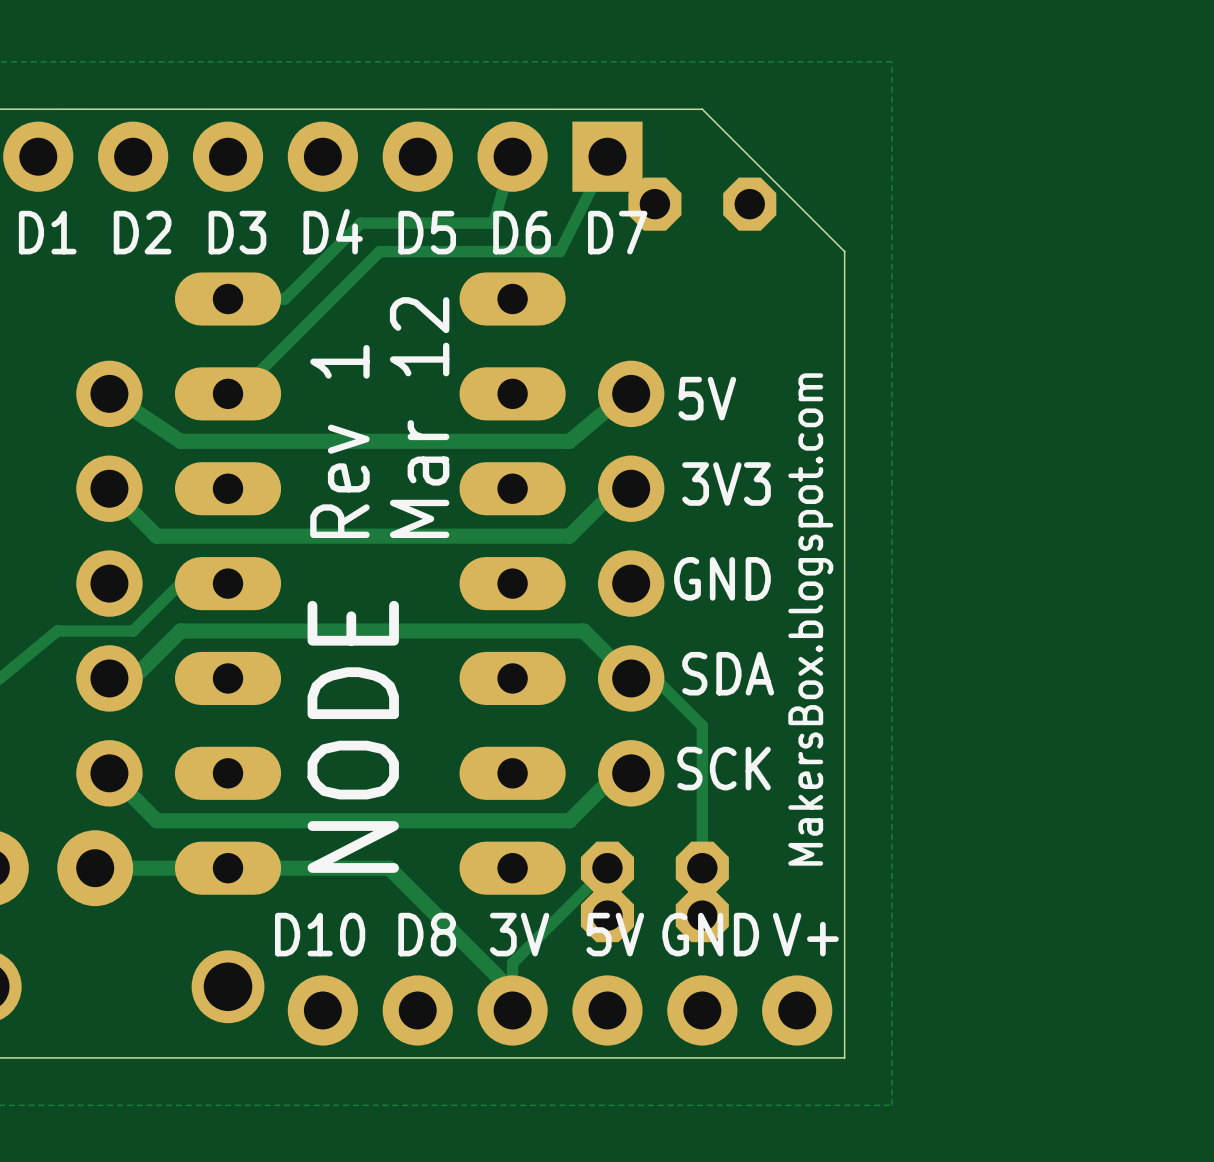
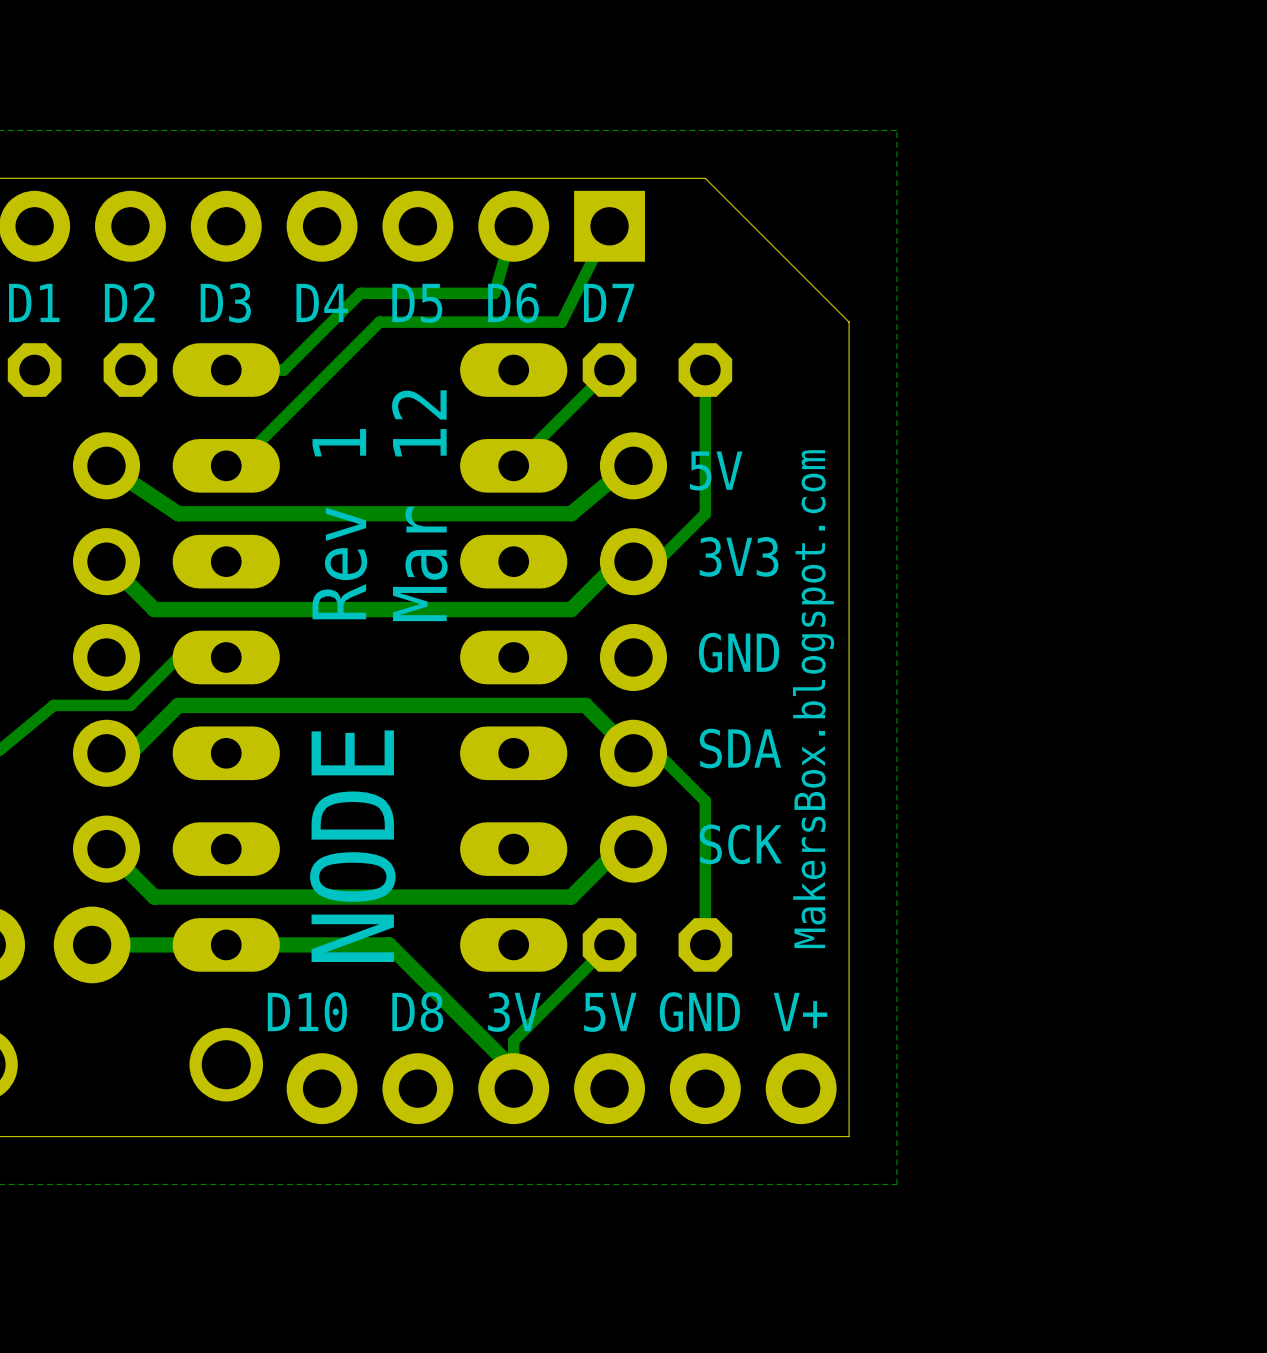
part position: (702, 204) -> (657, 370)
part: none -> (82, 370)
track: none -> (609, 370) (513, 465)
track: none -> (705, 370) (705, 513) (657, 561)
part: (654, 915) -> none

